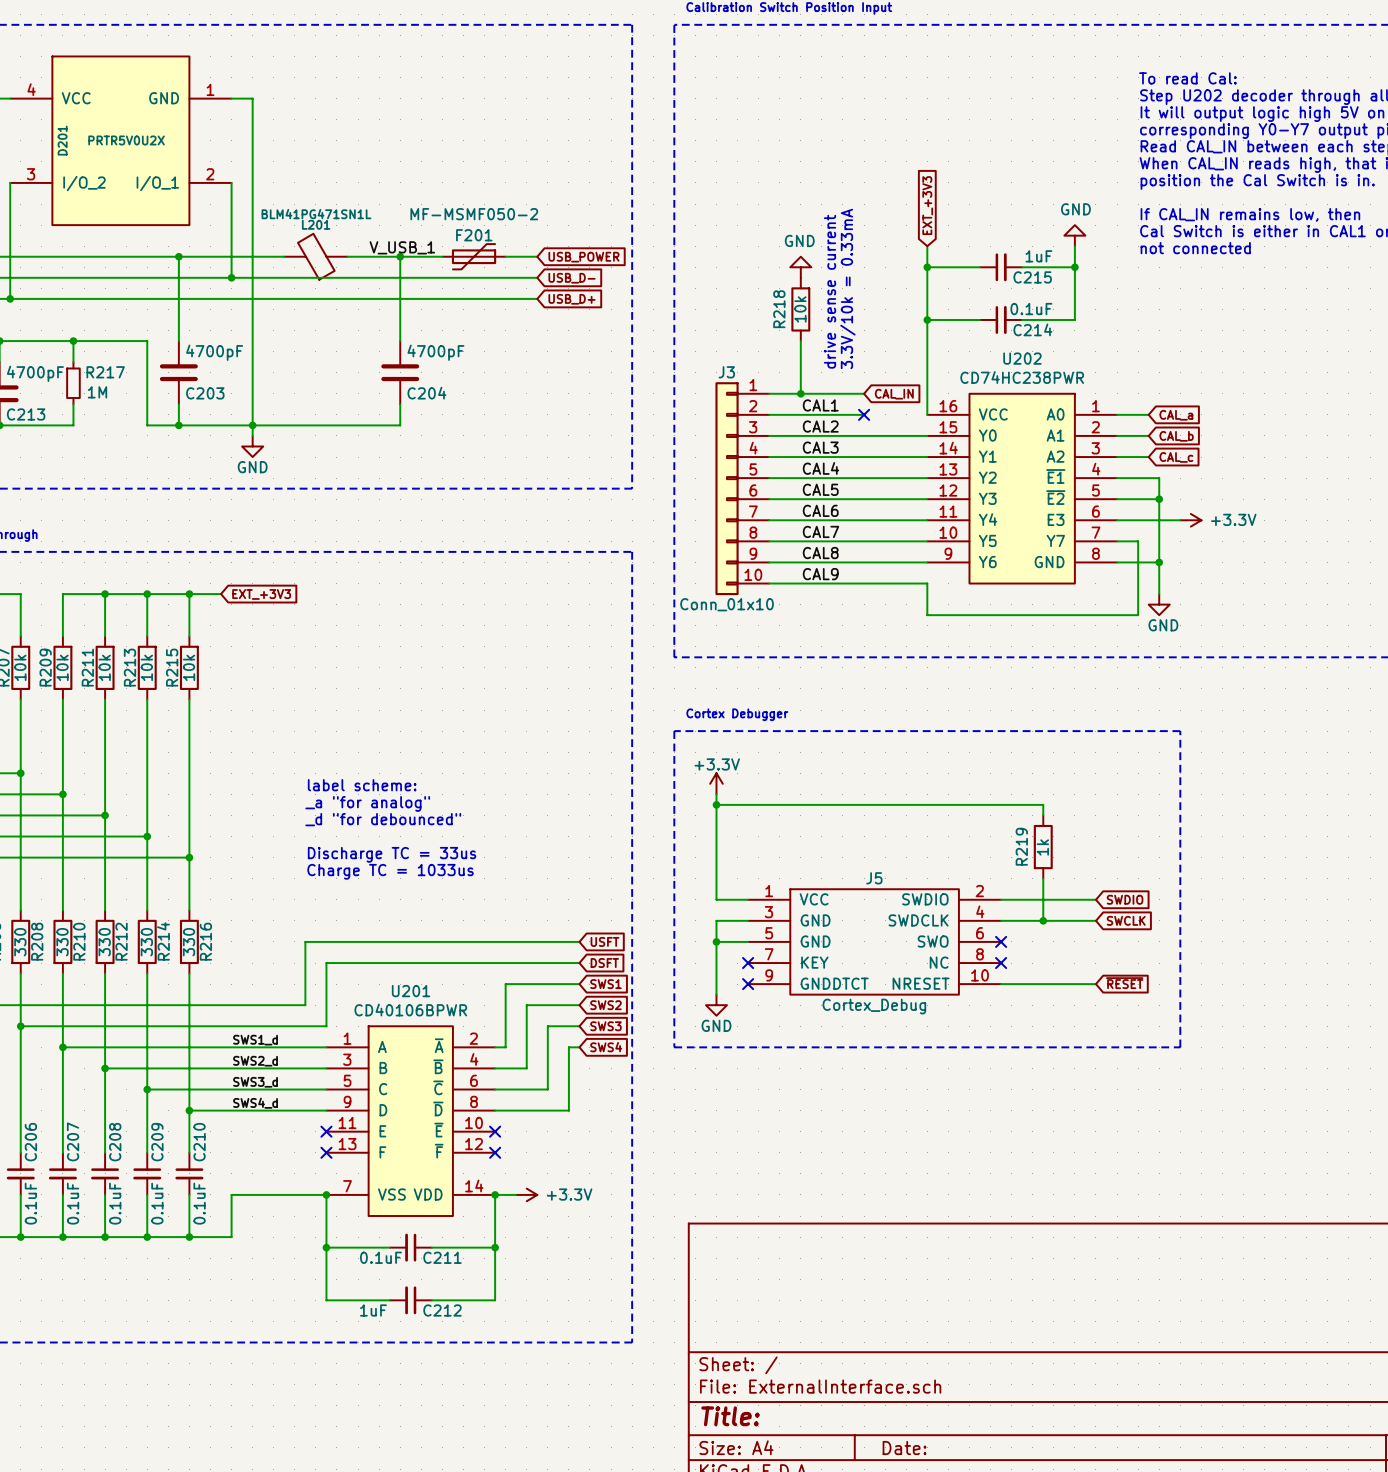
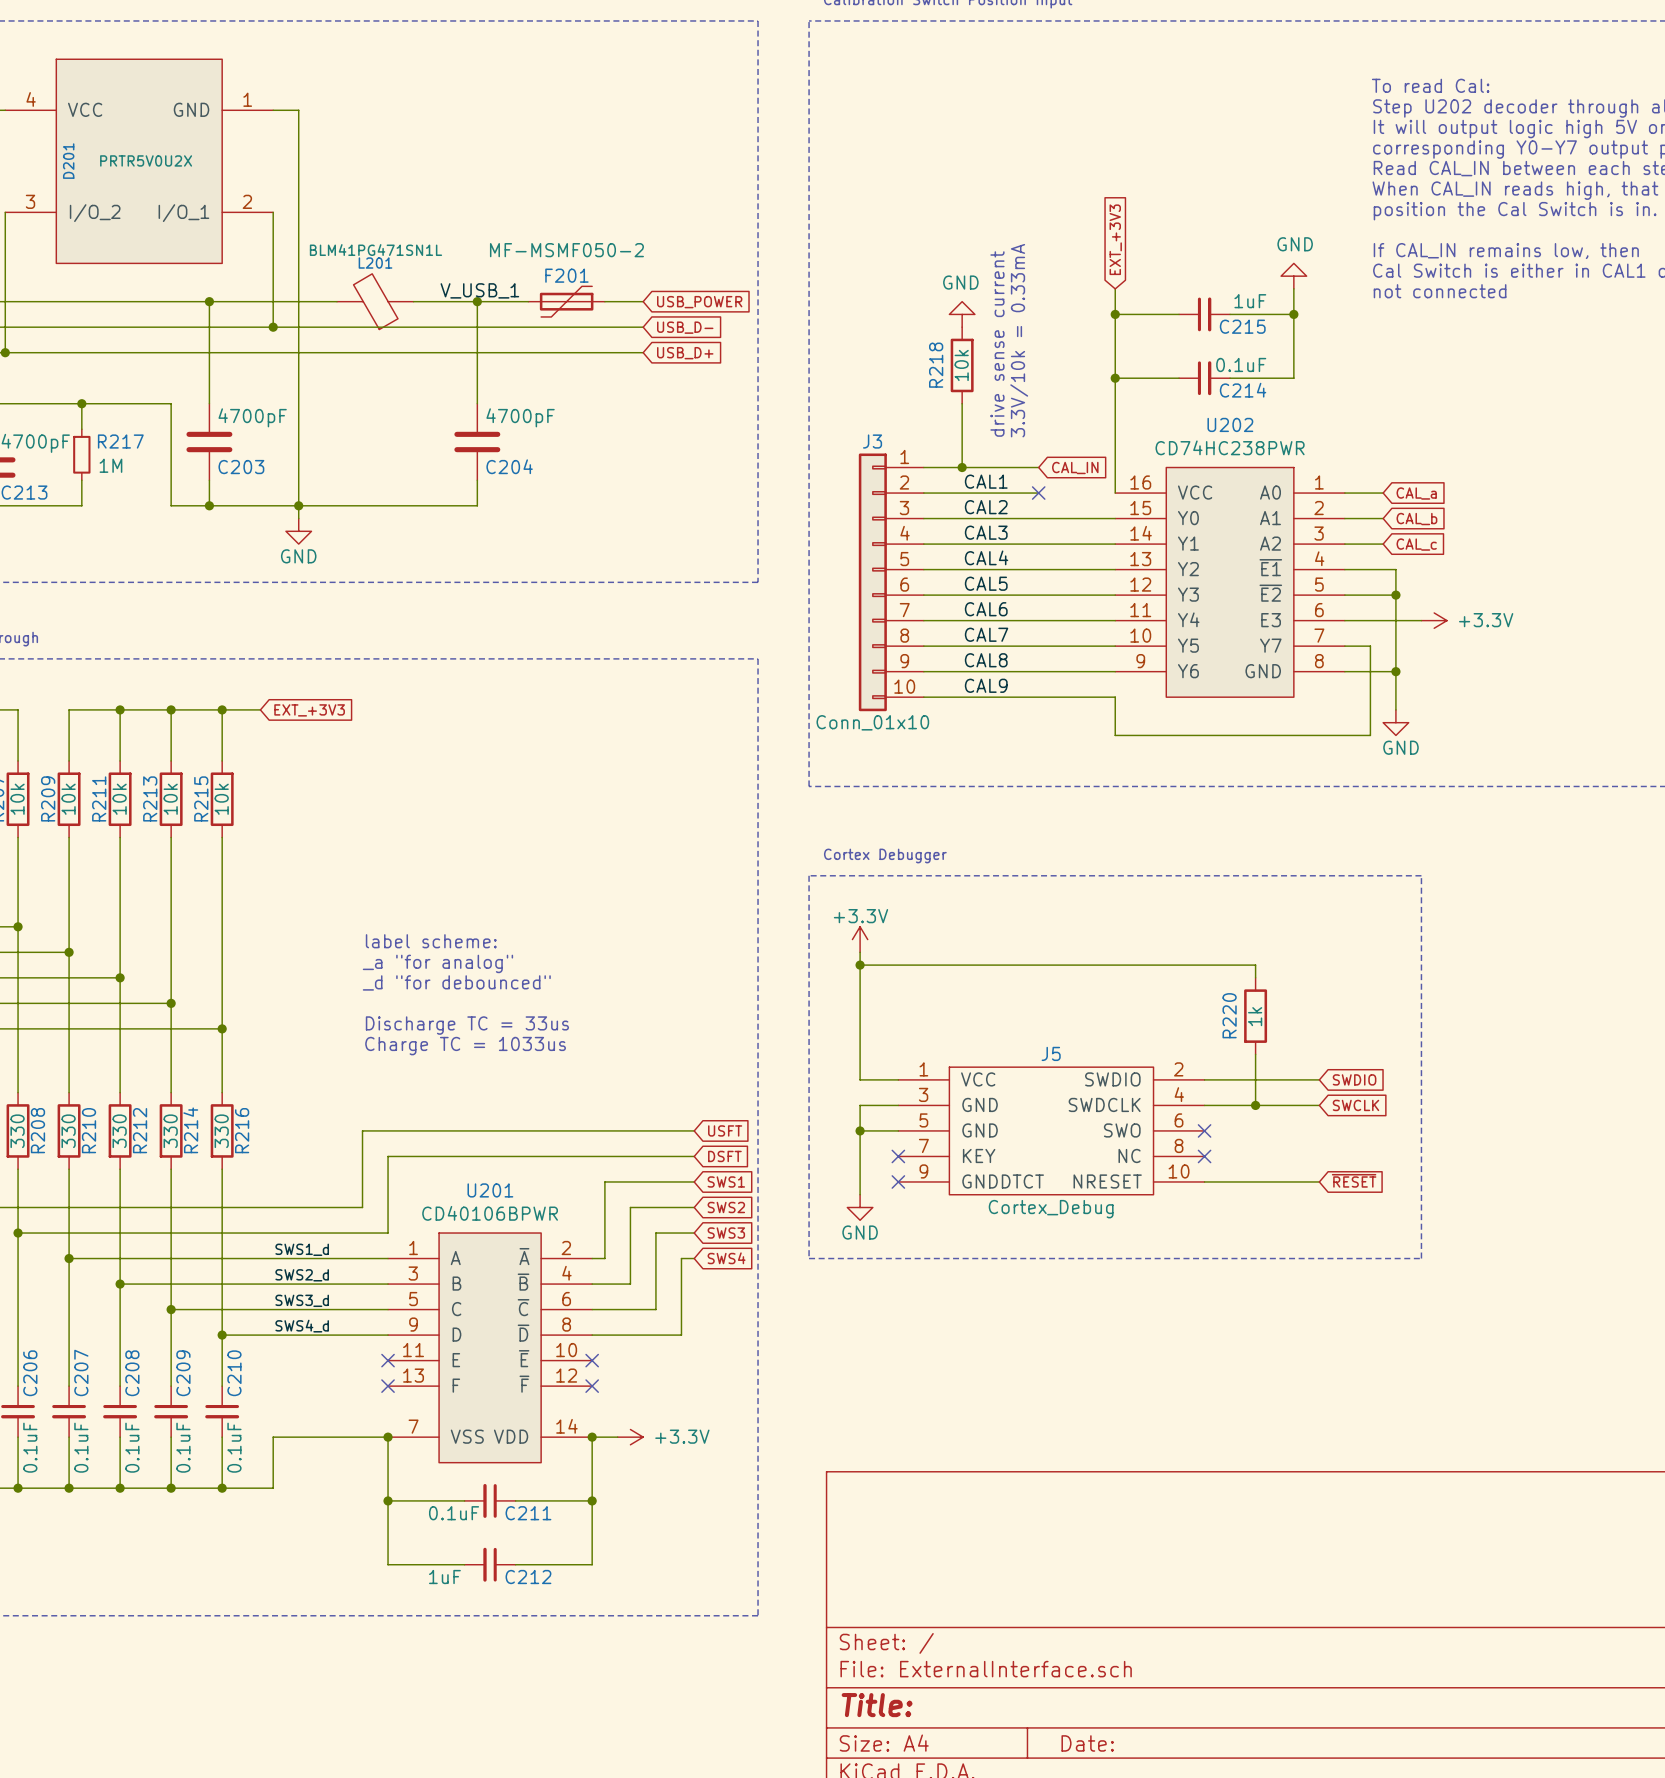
R219 name: R219 (1021, 846) -> R220 (1229, 1015)

